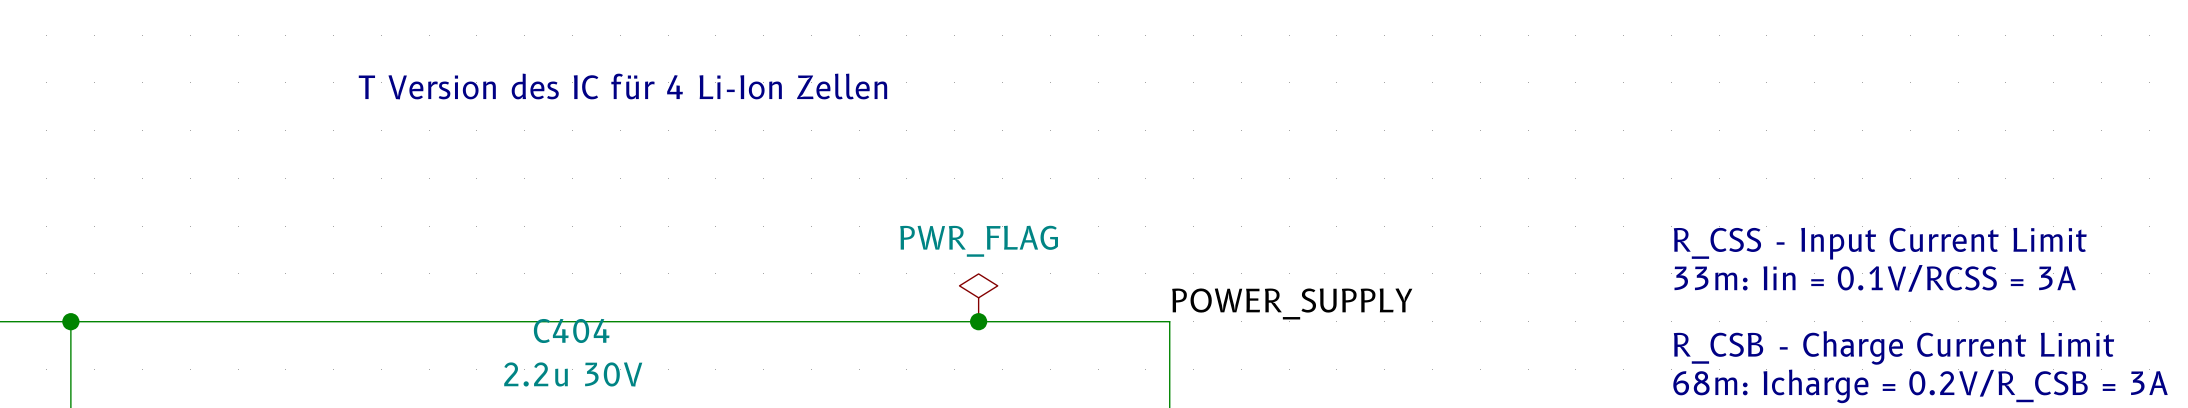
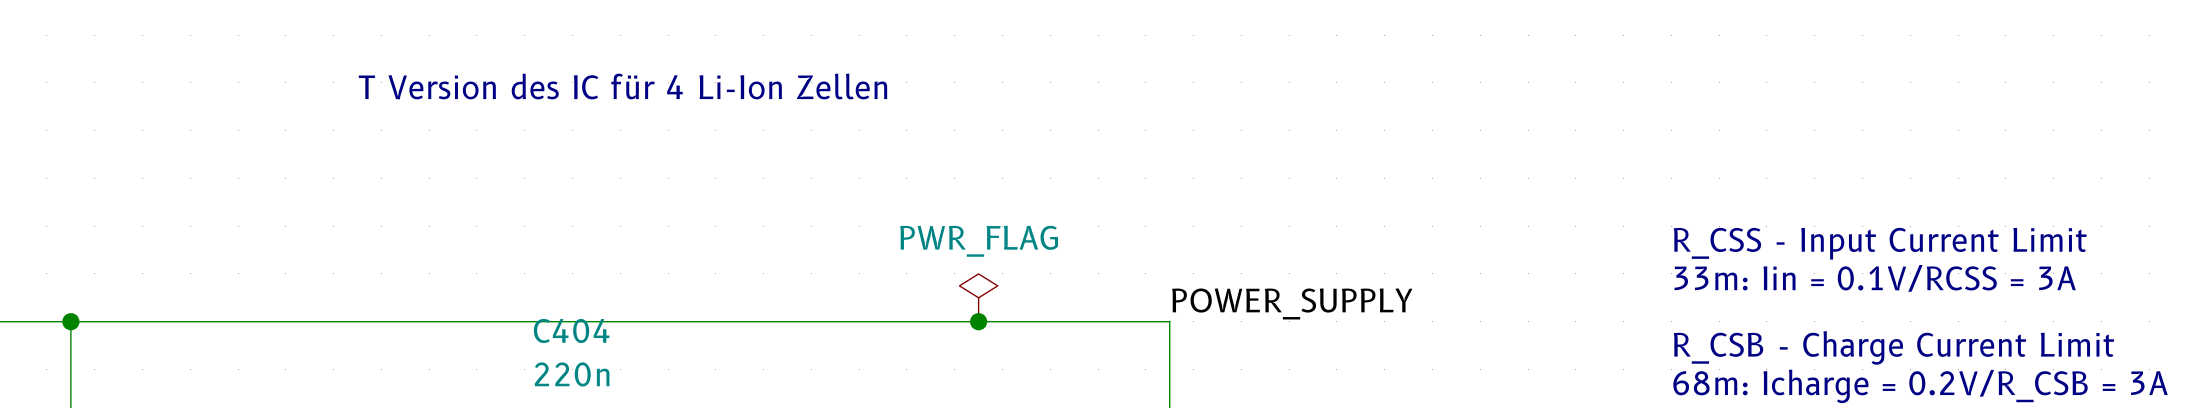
C404 value: 2.2u 30V (573, 374) -> 220n (572, 374)

